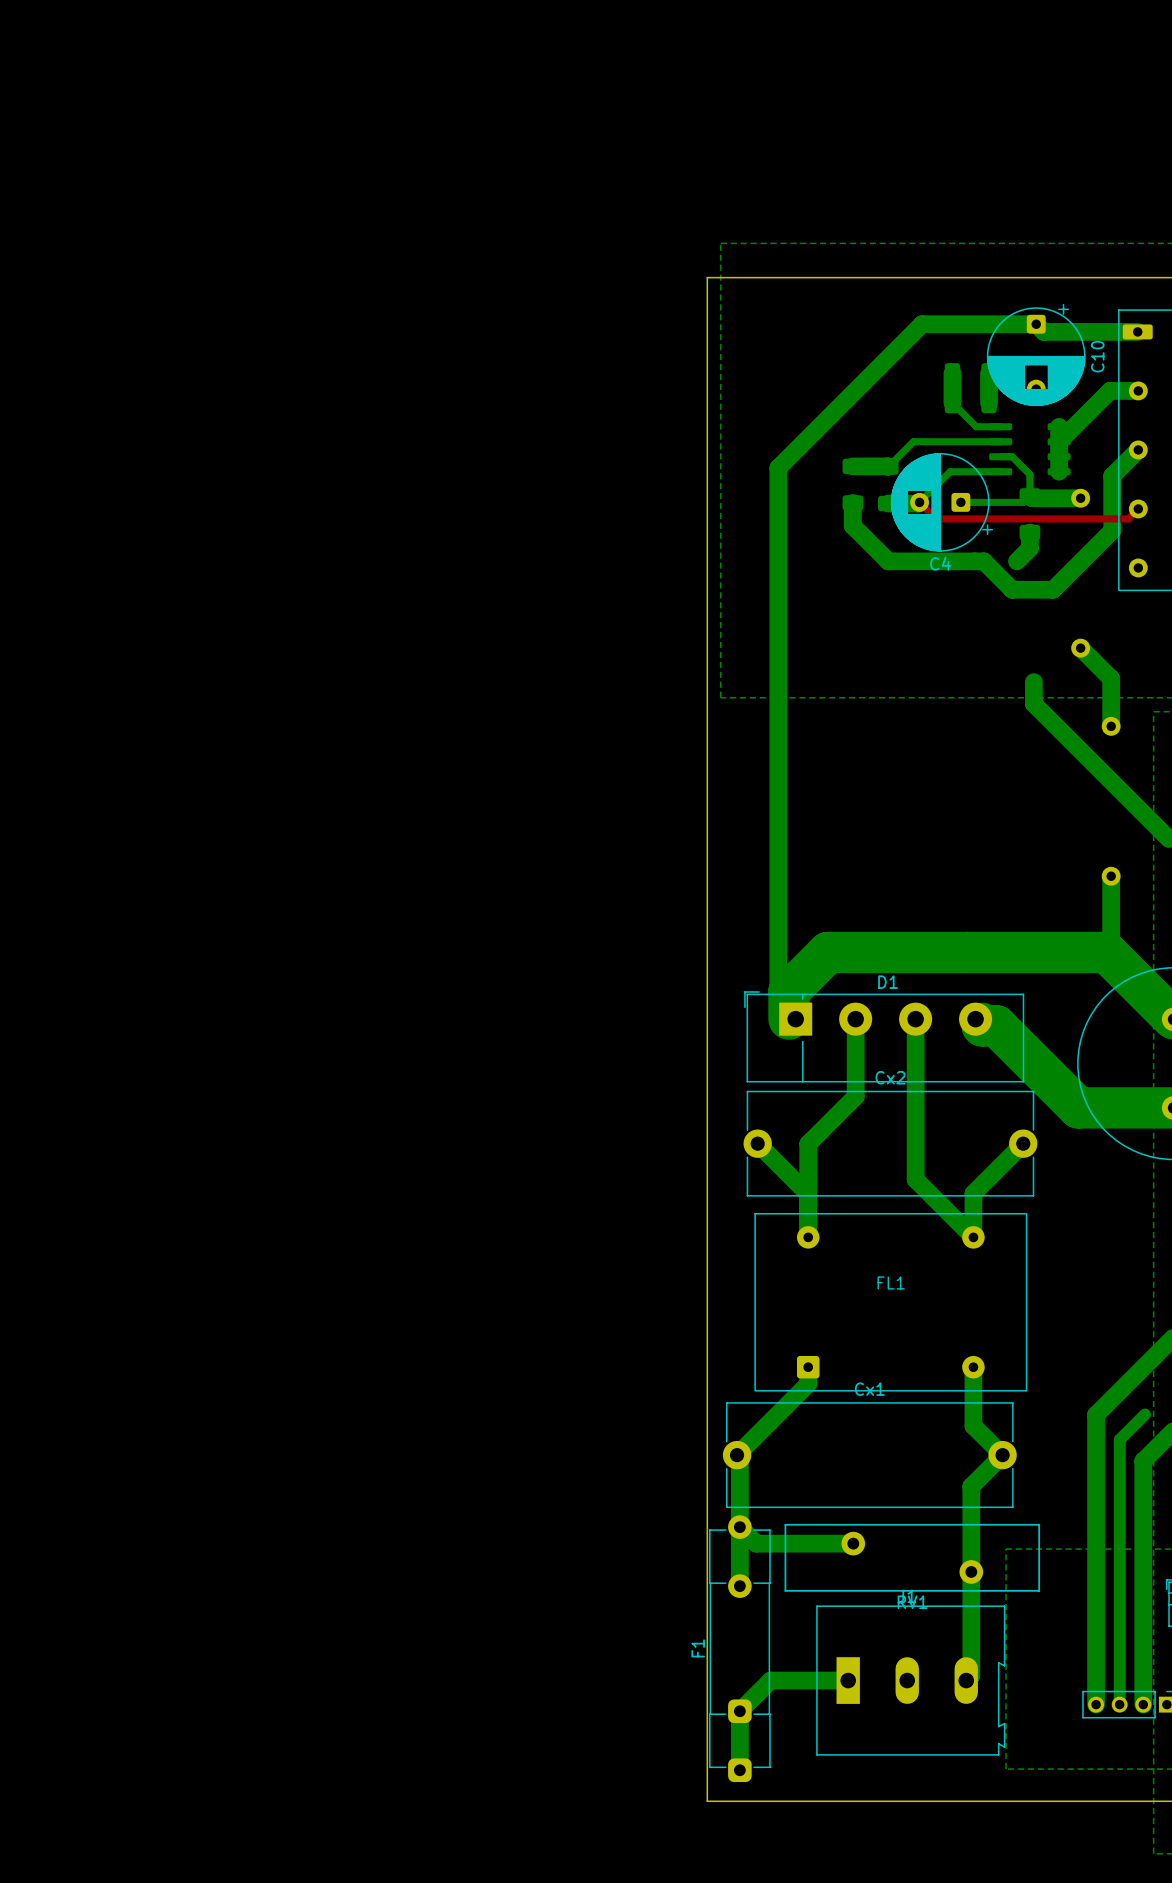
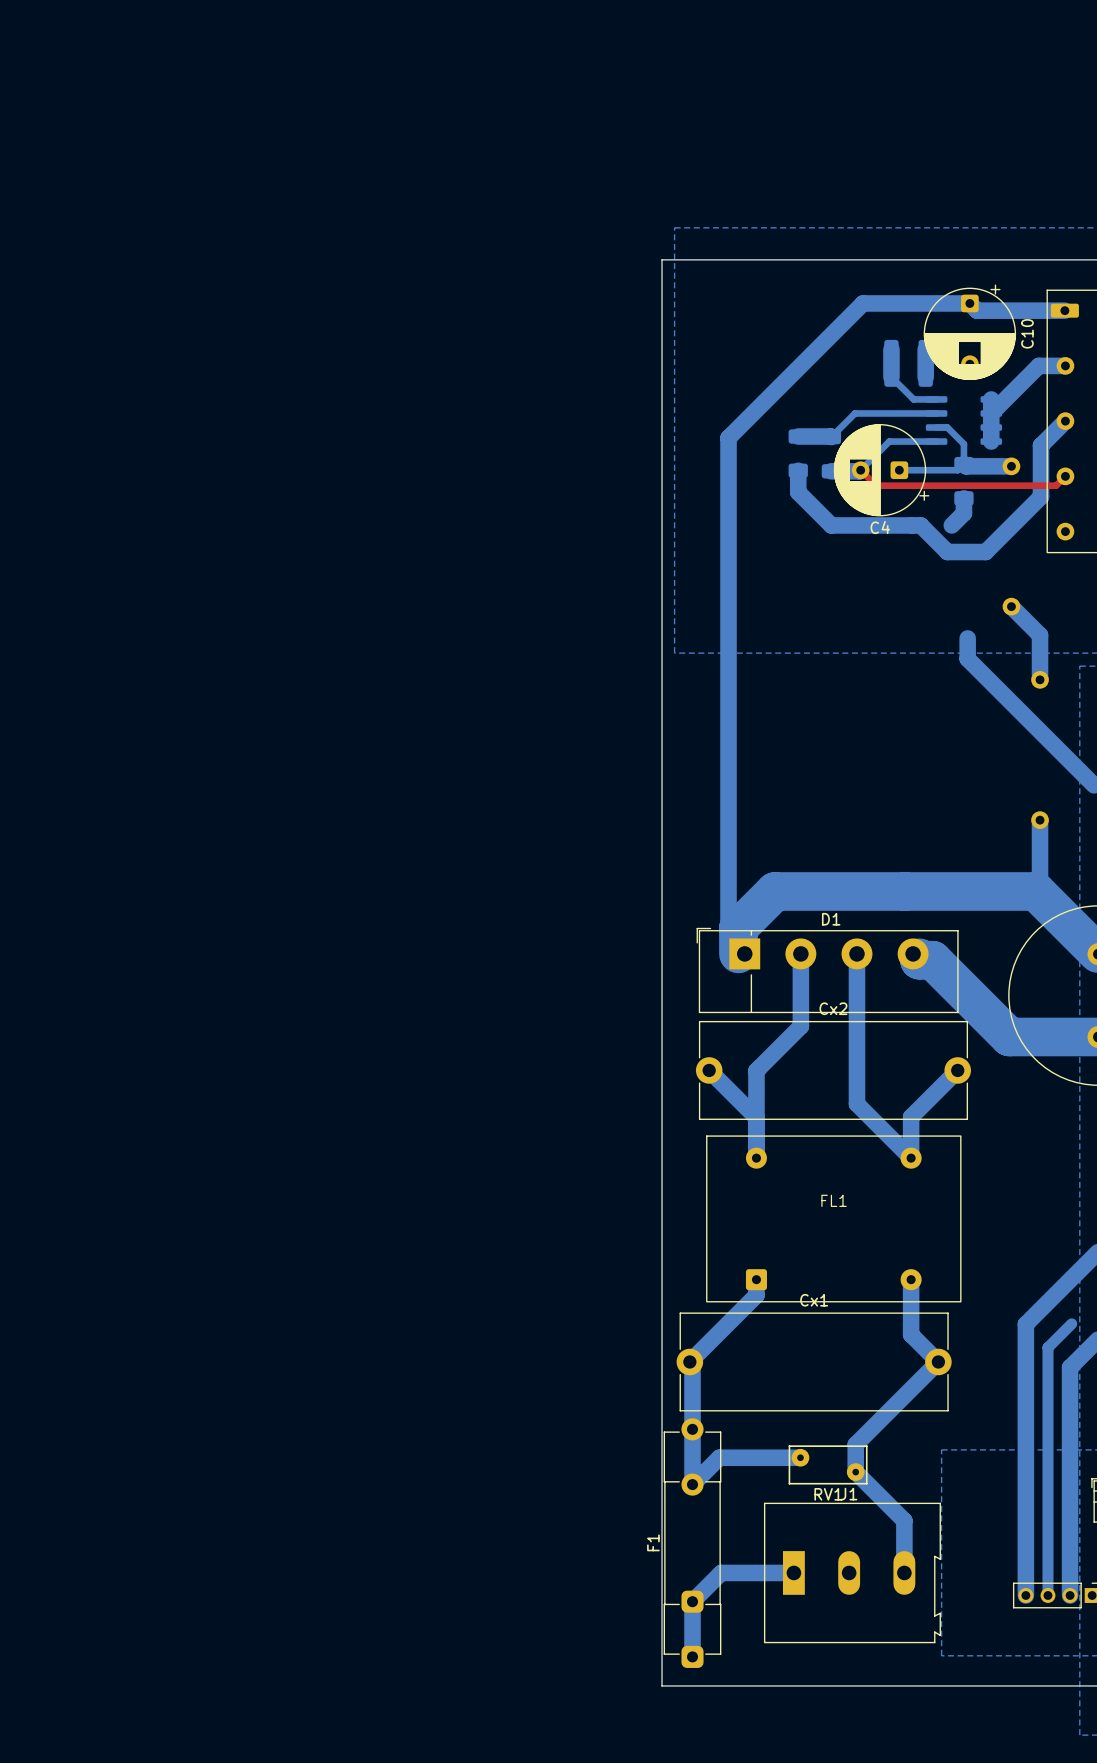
bottom track: (971, 1486) (971, 1675) (966, 1680) -> (909, 1391) (855, 1444) (855, 1472) (904, 1520) (904, 1572)
RV1 footprint: [784, 1523, 1041, 1592] -> [788, 1445, 868, 1485]
bottom track: (739, 1527) (756, 1543) (853, 1543) -> none
bottom track: none -> (800, 1457) (719, 1457) (692, 1484)

